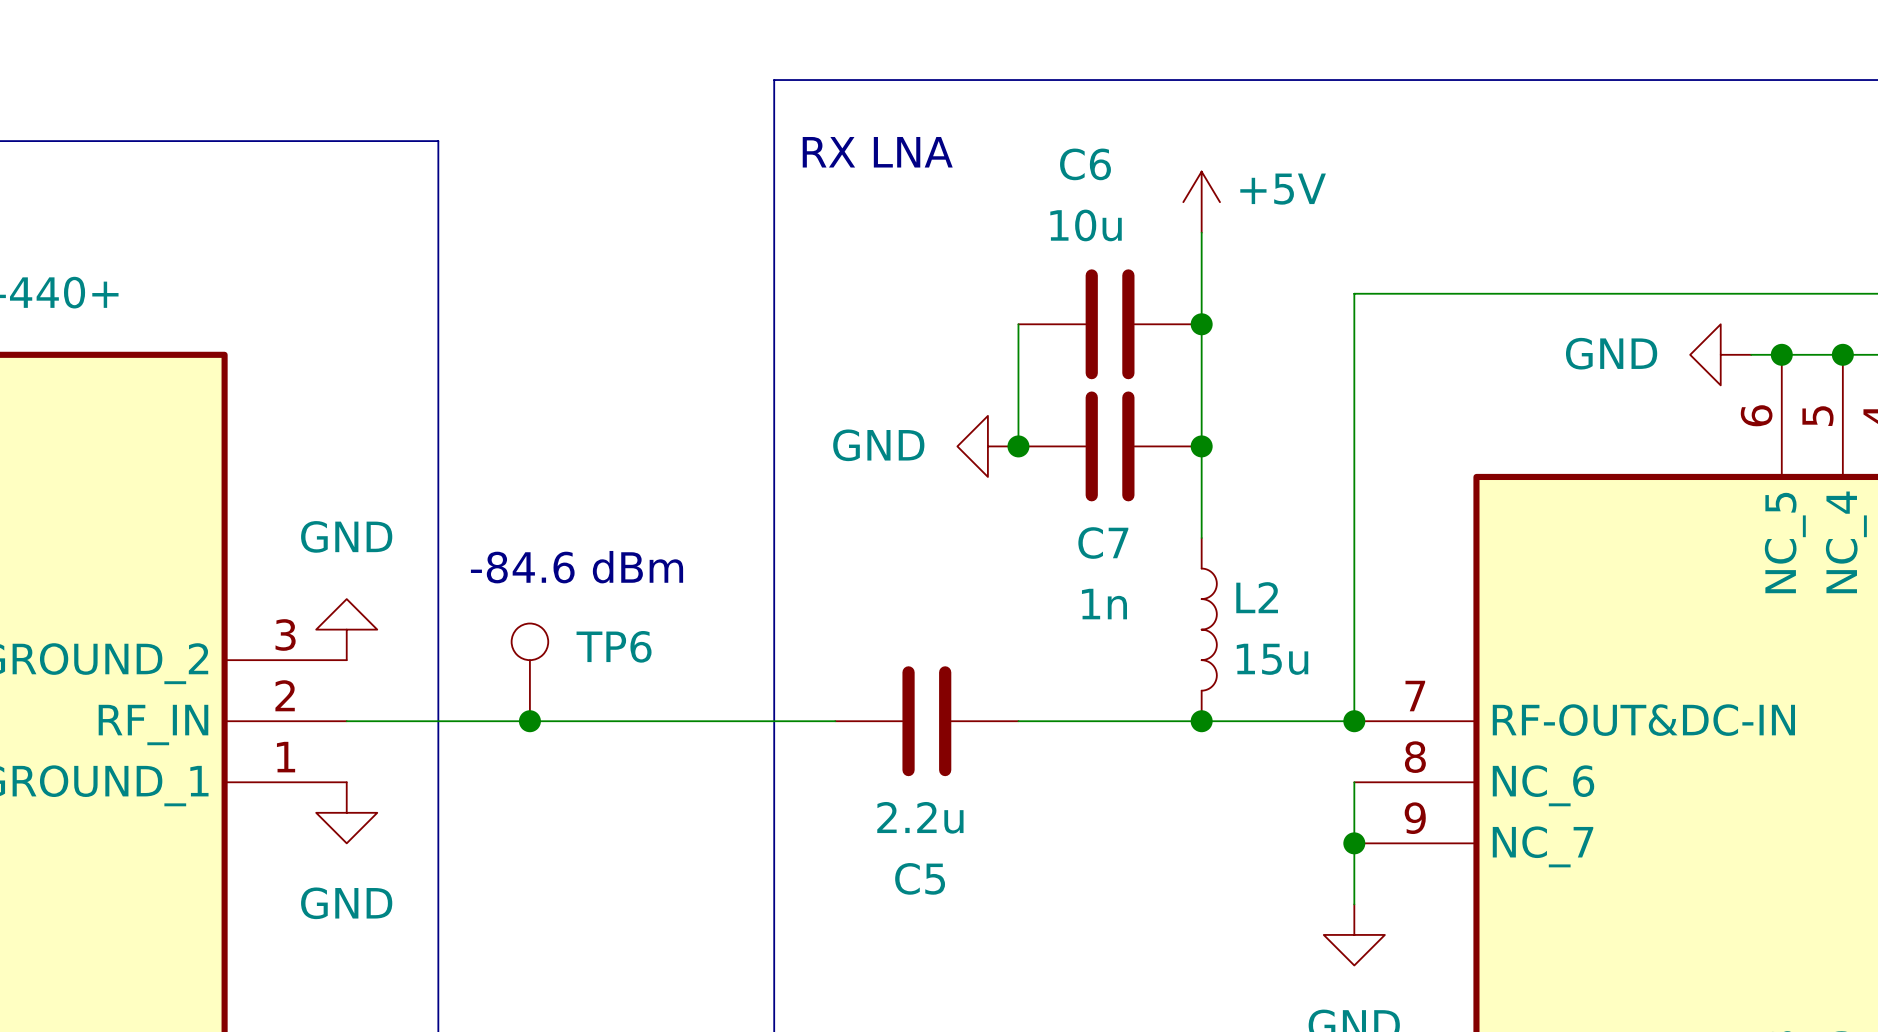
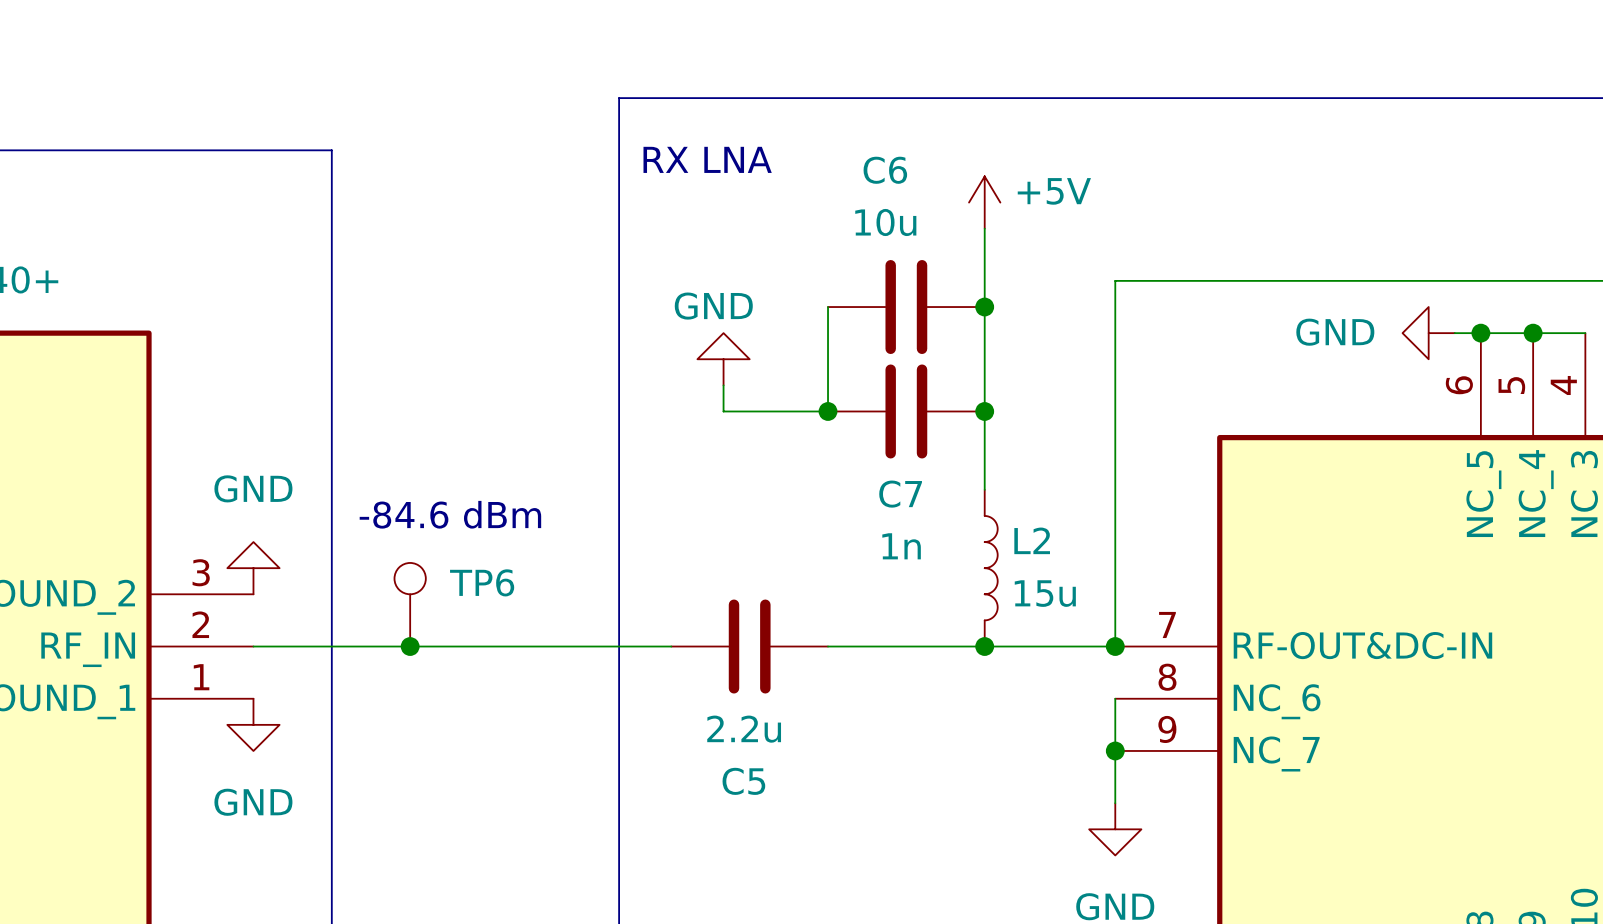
wire: none -> (723, 385) (723, 411) (828, 411)
power symbol text position: GND (878, 445) -> GND (713, 306)
power symbol rotation: 0° (987, 446) -> 90° clockwise (723, 359)
power symbol position: GND (987, 446) -> GND (723, 359)

